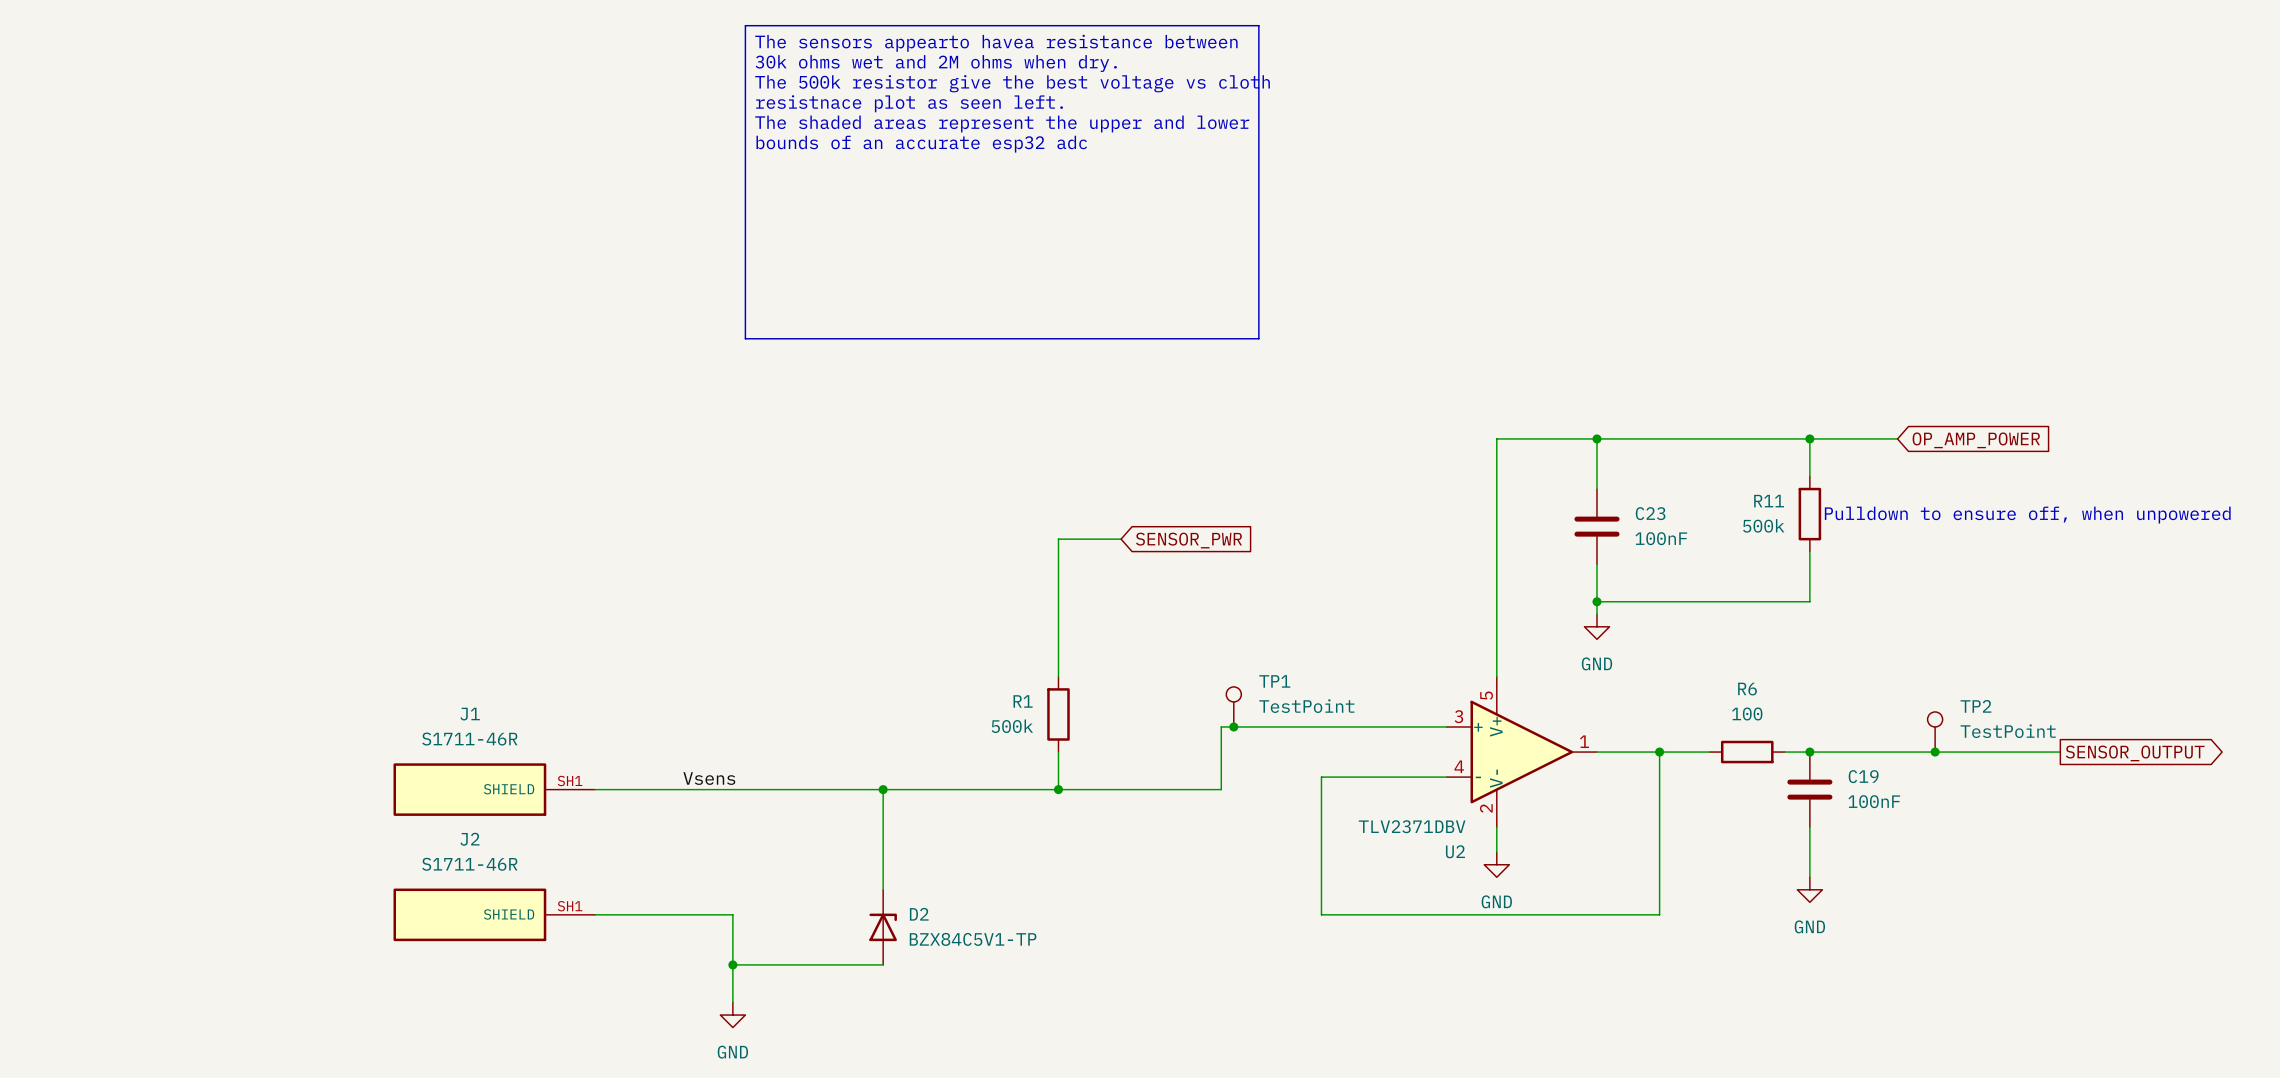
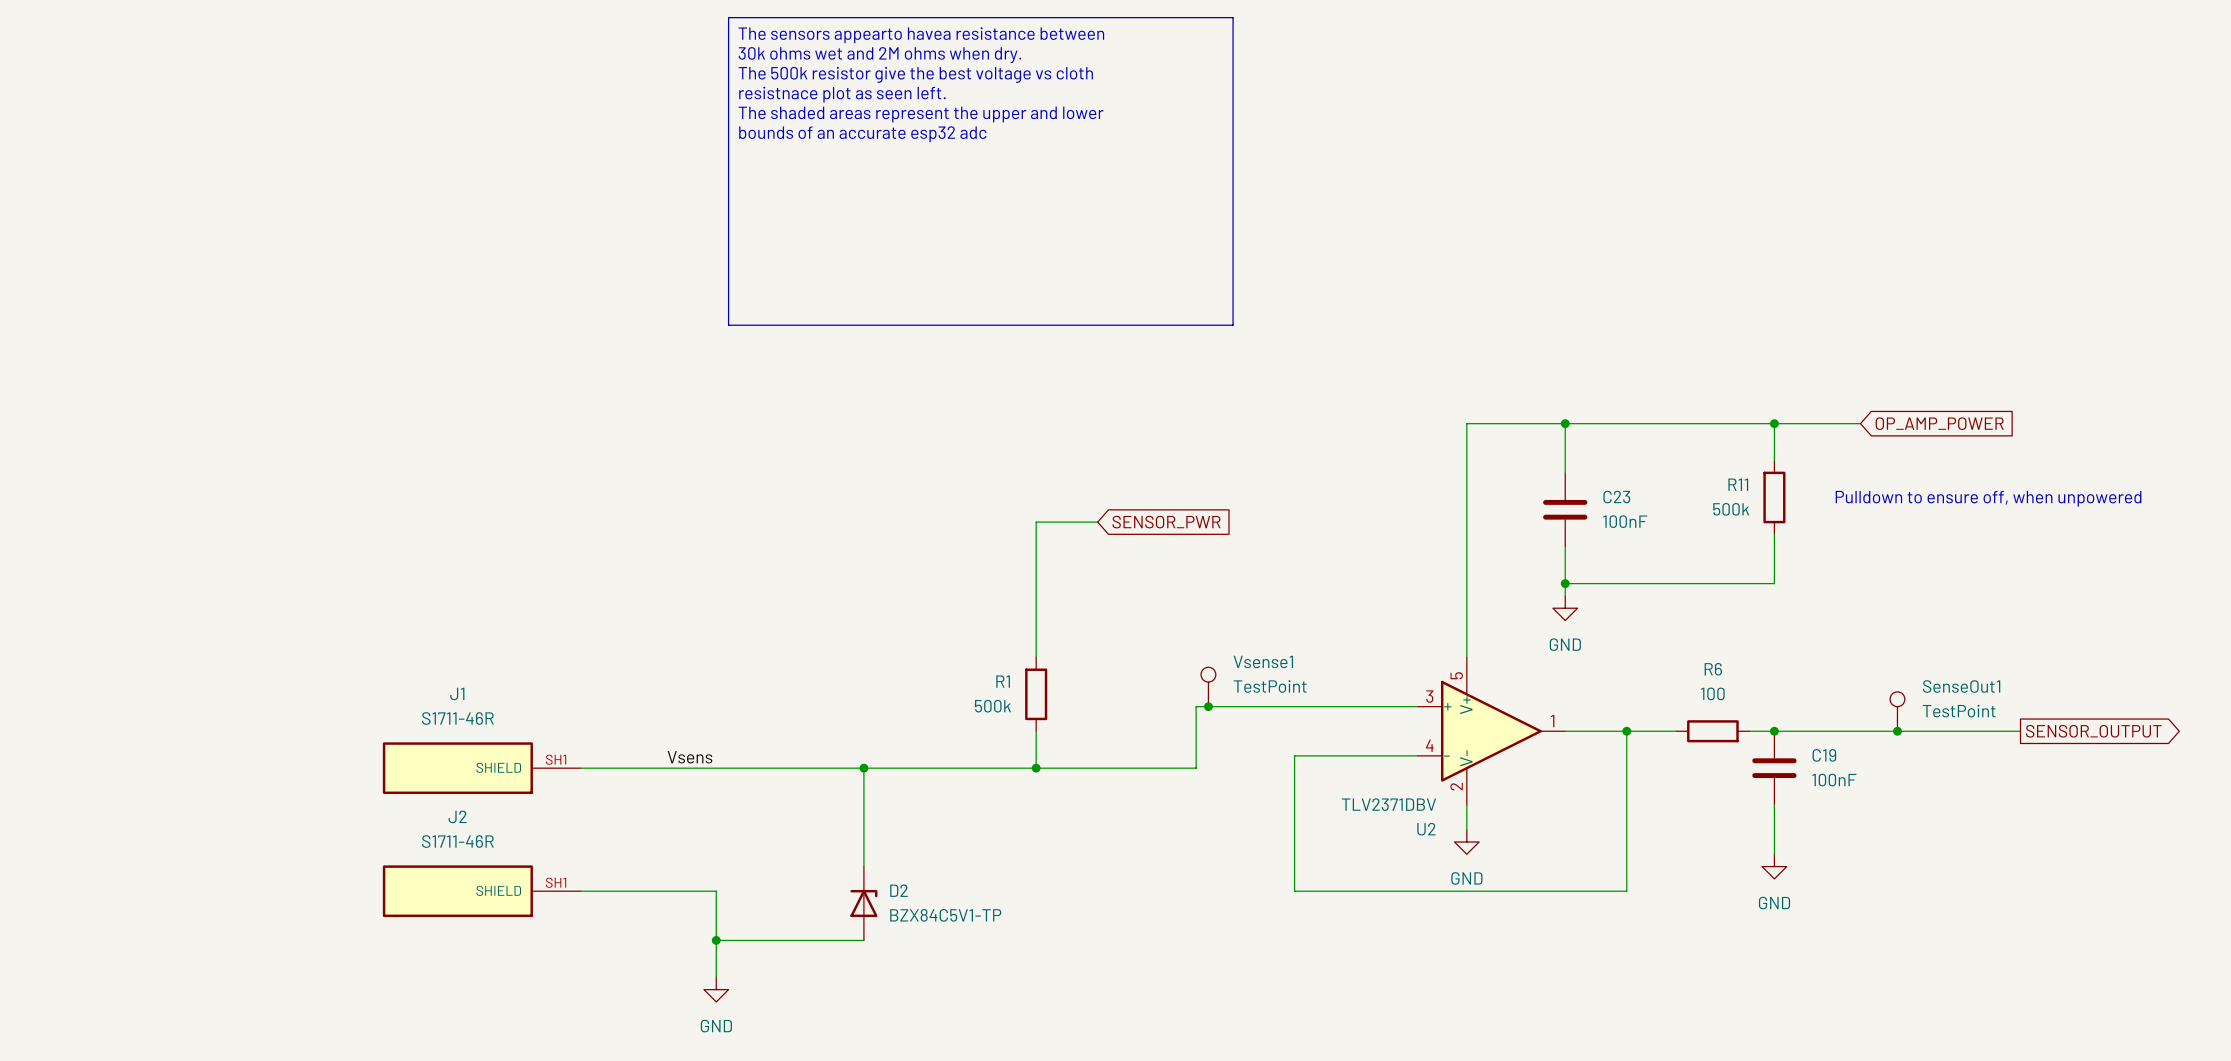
TP1 name: TP1 (1274, 681) -> Vsense1 (1263, 661)
TP2 name: TP2 (1975, 706) -> SenseOut1 (1961, 686)

